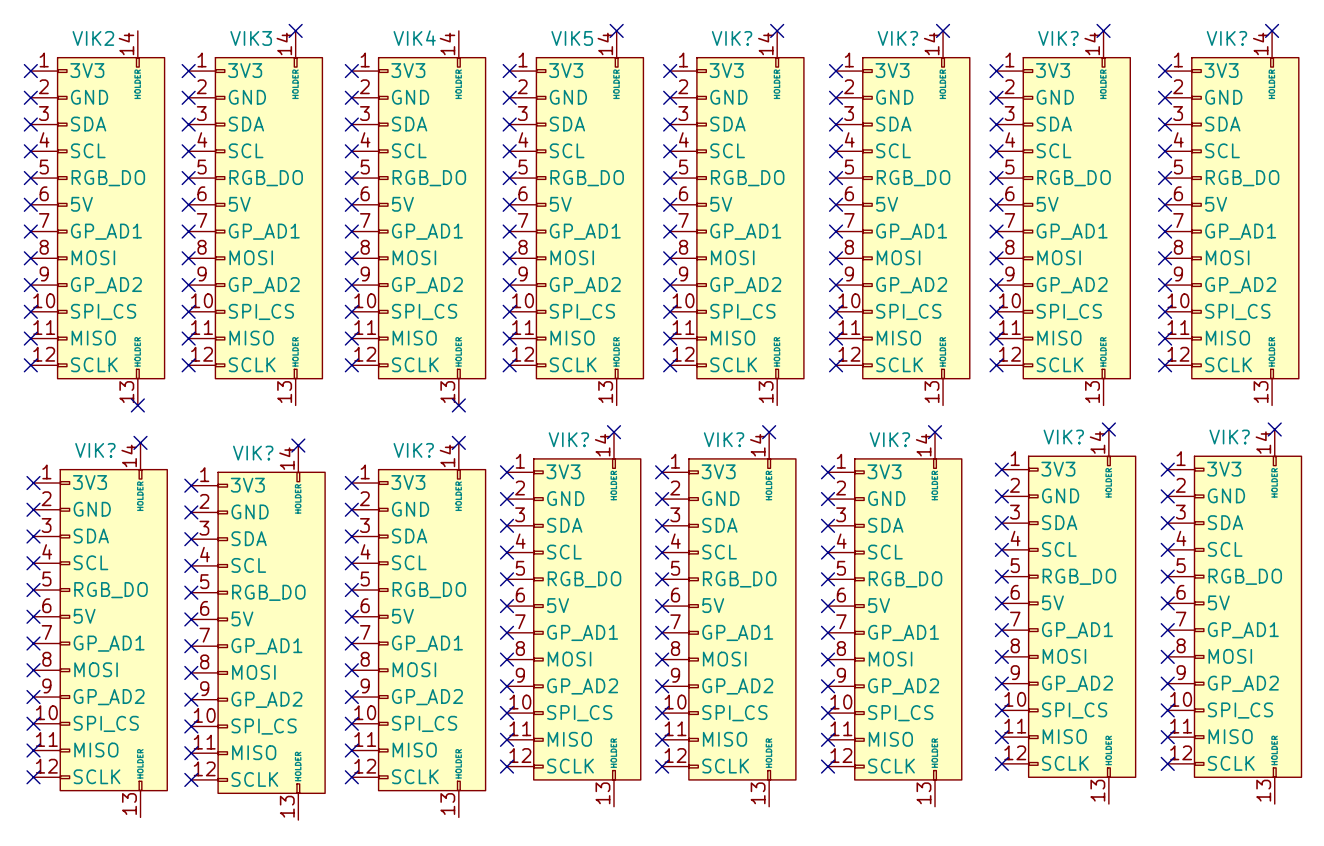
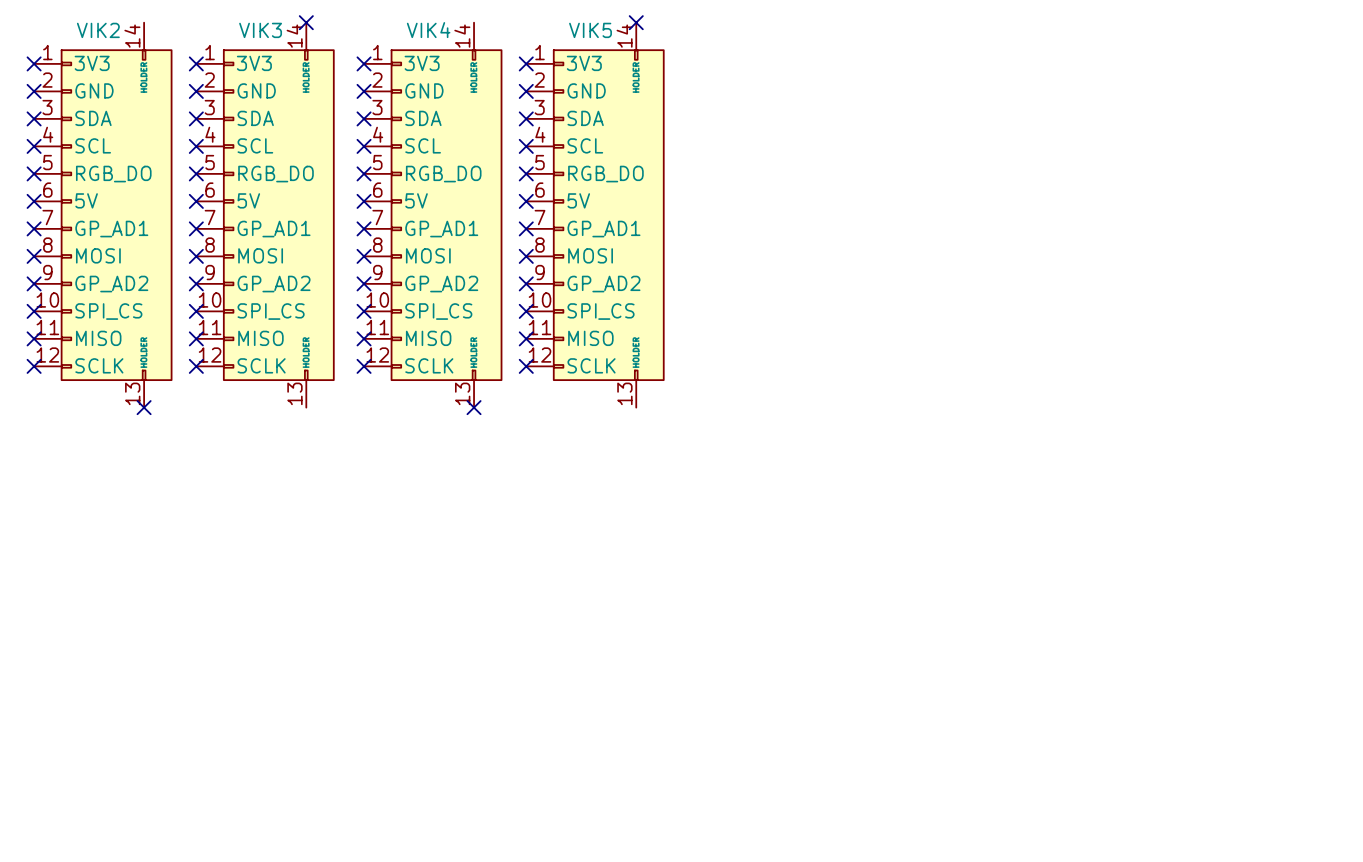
no-connect mark: (777, 30) -> none
no-connect mark: (943, 30) -> none
no-connect mark: (1103, 30) -> none
no-connect mark: (1272, 30) -> none
no-connect mark: (670, 71) -> none
no-connect mark: (836, 71) -> none
no-connect mark: (996, 71) -> none
no-connect mark: (1165, 71) -> none
no-connect mark: (670, 97) -> none
no-connect mark: (836, 97) -> none
no-connect mark: (996, 97) -> none
no-connect mark: (1165, 97) -> none
no-connect mark: (670, 124) -> none
no-connect mark: (836, 124) -> none
no-connect mark: (996, 124) -> none
no-connect mark: (1165, 124) -> none
no-connect mark: (670, 151) -> none
no-connect mark: (836, 151) -> none
no-connect mark: (996, 151) -> none
no-connect mark: (1165, 151) -> none
no-connect mark: (670, 178) -> none
no-connect mark: (836, 178) -> none
no-connect mark: (996, 178) -> none
no-connect mark: (1165, 178) -> none
no-connect mark: (670, 204) -> none
no-connect mark: (836, 204) -> none
no-connect mark: (996, 204) -> none
no-connect mark: (1165, 204) -> none
VIK?: (737, 218) -> none
VIK?: (902, 218) -> none
VIK?: (1063, 218) -> none
VIK?: (1231, 218) -> none
no-connect mark: (670, 231) -> none
no-connect mark: (836, 231) -> none
no-connect mark: (996, 231) -> none
no-connect mark: (1165, 231) -> none
no-connect mark: (670, 258) -> none
no-connect mark: (836, 258) -> none
no-connect mark: (996, 258) -> none
no-connect mark: (1165, 258) -> none
no-connect mark: (670, 285) -> none
no-connect mark: (836, 285) -> none
no-connect mark: (996, 285) -> none
no-connect mark: (1165, 285) -> none
no-connect mark: (670, 311) -> none
no-connect mark: (836, 311) -> none
no-connect mark: (996, 311) -> none
no-connect mark: (1165, 311) -> none
no-connect mark: (670, 338) -> none
no-connect mark: (836, 338) -> none
no-connect mark: (996, 338) -> none
no-connect mark: (1165, 338) -> none
no-connect mark: (670, 365) -> none
no-connect mark: (836, 365) -> none
no-connect mark: (996, 365) -> none
no-connect mark: (1165, 365) -> none
no-connect mark: (1108, 429) -> none
no-connect mark: (1274, 429) -> none
no-connect mark: (613, 432) -> none
no-connect mark: (769, 432) -> none
no-connect mark: (935, 432) -> none
no-connect mark: (140, 442) -> none
no-connect mark: (458, 442) -> none
no-connect mark: (298, 445) -> none
no-connect mark: (1001, 469) -> none
no-connect mark: (1167, 469) -> none
no-connect mark: (506, 472) -> none
no-connect mark: (662, 472) -> none
no-connect mark: (828, 472) -> none
no-connect mark: (33, 483) -> none
no-connect mark: (351, 483) -> none
no-connect mark: (191, 485) -> none
no-connect mark: (1001, 496) -> none
no-connect mark: (1167, 496) -> none
no-connect mark: (506, 499) -> none
no-connect mark: (662, 499) -> none
no-connect mark: (828, 499) -> none
no-connect mark: (33, 509) -> none
no-connect mark: (351, 509) -> none
no-connect mark: (191, 512) -> none
no-connect mark: (1001, 523) -> none
no-connect mark: (1167, 523) -> none
no-connect mark: (506, 525) -> none
no-connect mark: (662, 525) -> none
no-connect mark: (828, 525) -> none
no-connect mark: (33, 536) -> none
no-connect mark: (351, 536) -> none
no-connect mark: (191, 539) -> none
no-connect mark: (1001, 549) -> none
no-connect mark: (1167, 549) -> none
no-connect mark: (506, 552) -> none
no-connect mark: (662, 552) -> none
no-connect mark: (828, 552) -> none
no-connect mark: (33, 563) -> none
no-connect mark: (351, 563) -> none
no-connect mark: (191, 565) -> none
no-connect mark: (1001, 576) -> none
no-connect mark: (1167, 576) -> none
no-connect mark: (506, 579) -> none
no-connect mark: (662, 579) -> none
no-connect mark: (828, 579) -> none
no-connect mark: (33, 590) -> none
no-connect mark: (351, 590) -> none
no-connect mark: (191, 592) -> none
no-connect mark: (1001, 603) -> none
no-connect mark: (1167, 603) -> none
no-connect mark: (506, 606) -> none
no-connect mark: (662, 606) -> none
no-connect mark: (828, 606) -> none
no-connect mark: (33, 616) -> none
no-connect mark: (351, 616) -> none
VIK?: (1068, 616) -> none
VIK?: (1234, 616) -> none
no-connect mark: (191, 619) -> none
VIK?: (573, 619) -> none
VIK?: (729, 619) -> none
VIK?: (894, 619) -> none
VIK?: (100, 630) -> none
VIK?: (418, 630) -> none
no-connect mark: (1001, 630) -> none
no-connect mark: (1167, 630) -> none
VIK?: (258, 632) -> none
no-connect mark: (506, 632) -> none
no-connect mark: (662, 632) -> none
no-connect mark: (828, 632) -> none
no-connect mark: (33, 643) -> none
no-connect mark: (351, 643) -> none
no-connect mark: (191, 646) -> none
no-connect mark: (1001, 656) -> none
no-connect mark: (1167, 656) -> none
no-connect mark: (506, 659) -> none
no-connect mark: (662, 659) -> none
no-connect mark: (828, 659) -> none
no-connect mark: (33, 670) -> none
no-connect mark: (351, 670) -> none
no-connect mark: (191, 672) -> none
no-connect mark: (1001, 683) -> none
no-connect mark: (1167, 683) -> none
no-connect mark: (506, 686) -> none
no-connect mark: (662, 686) -> none
no-connect mark: (828, 686) -> none
no-connect mark: (33, 697) -> none
no-connect mark: (351, 697) -> none
no-connect mark: (191, 699) -> none
no-connect mark: (1001, 710) -> none
no-connect mark: (1167, 710) -> none
no-connect mark: (506, 713) -> none
no-connect mark: (662, 713) -> none
no-connect mark: (828, 713) -> none
no-connect mark: (33, 723) -> none
no-connect mark: (351, 723) -> none
no-connect mark: (191, 726) -> none
no-connect mark: (1001, 737) -> none
no-connect mark: (1167, 737) -> none
no-connect mark: (506, 739) -> none
no-connect mark: (662, 739) -> none
no-connect mark: (828, 739) -> none
no-connect mark: (33, 750) -> none
no-connect mark: (351, 750) -> none
no-connect mark: (191, 753) -> none
no-connect mark: (1001, 763) -> none
no-connect mark: (1167, 763) -> none
no-connect mark: (506, 766) -> none
no-connect mark: (662, 766) -> none
no-connect mark: (828, 766) -> none
no-connect mark: (33, 777) -> none
no-connect mark: (351, 777) -> none
no-connect mark: (191, 779) -> none

